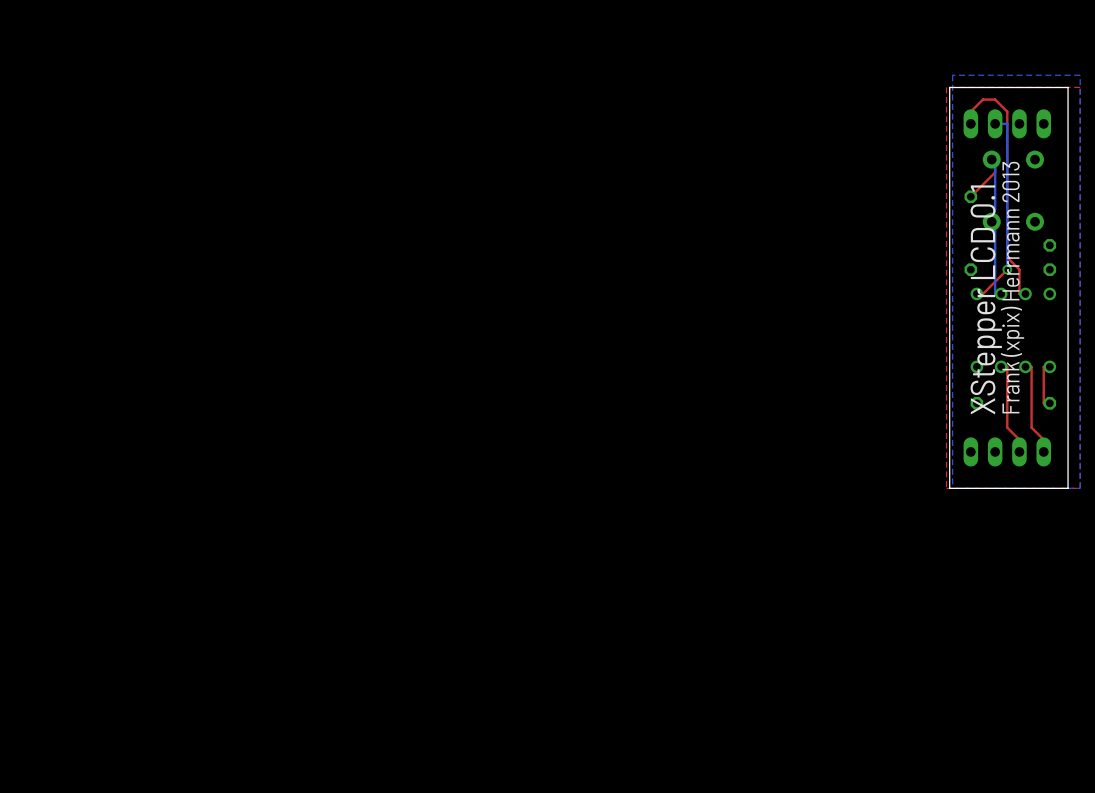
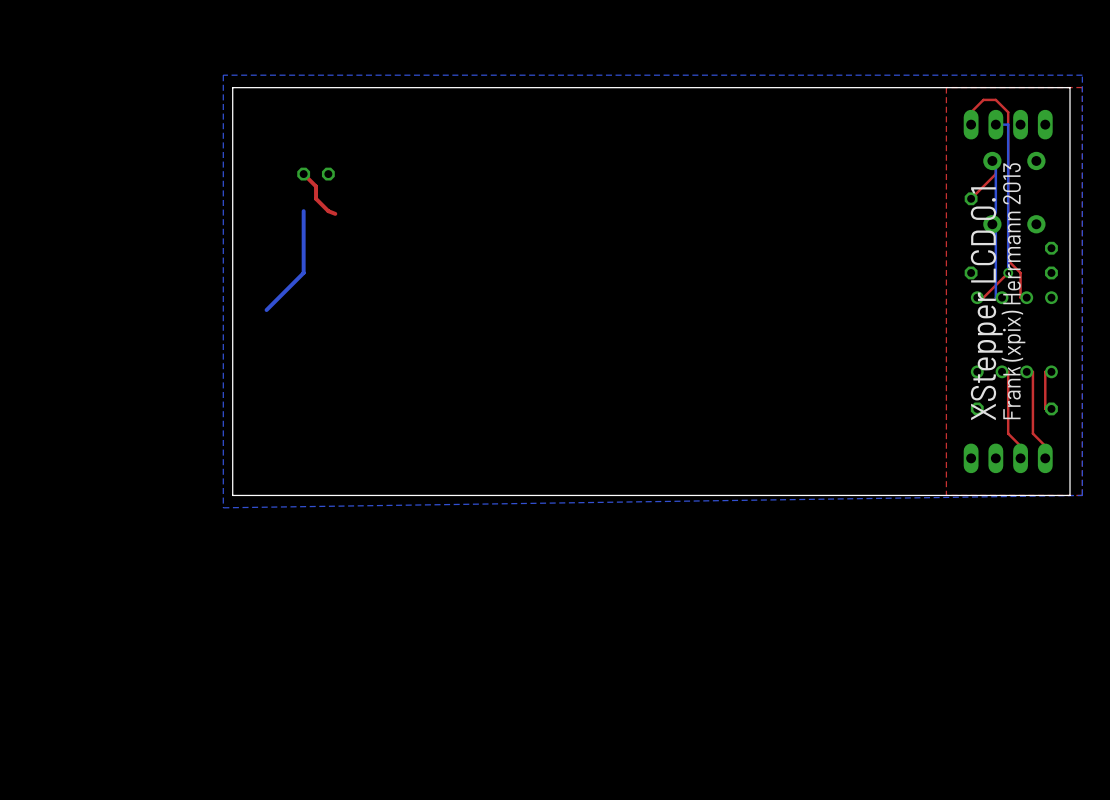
bottom zone outline: (952, 75) (952, 488) (1080, 488) -> (952, 75) (223, 75) (223, 507) (1082, 495)
board edge: (949, 87) (949, 488) -> (949, 87) (232, 87) (232, 495) (949, 495)
top track: none -> (303, 174) (316, 186) (316, 198) (328, 211) (335, 213)
part: none -> (316, 174)
bottom track: none -> (303, 211) (303, 272) (266, 310)

